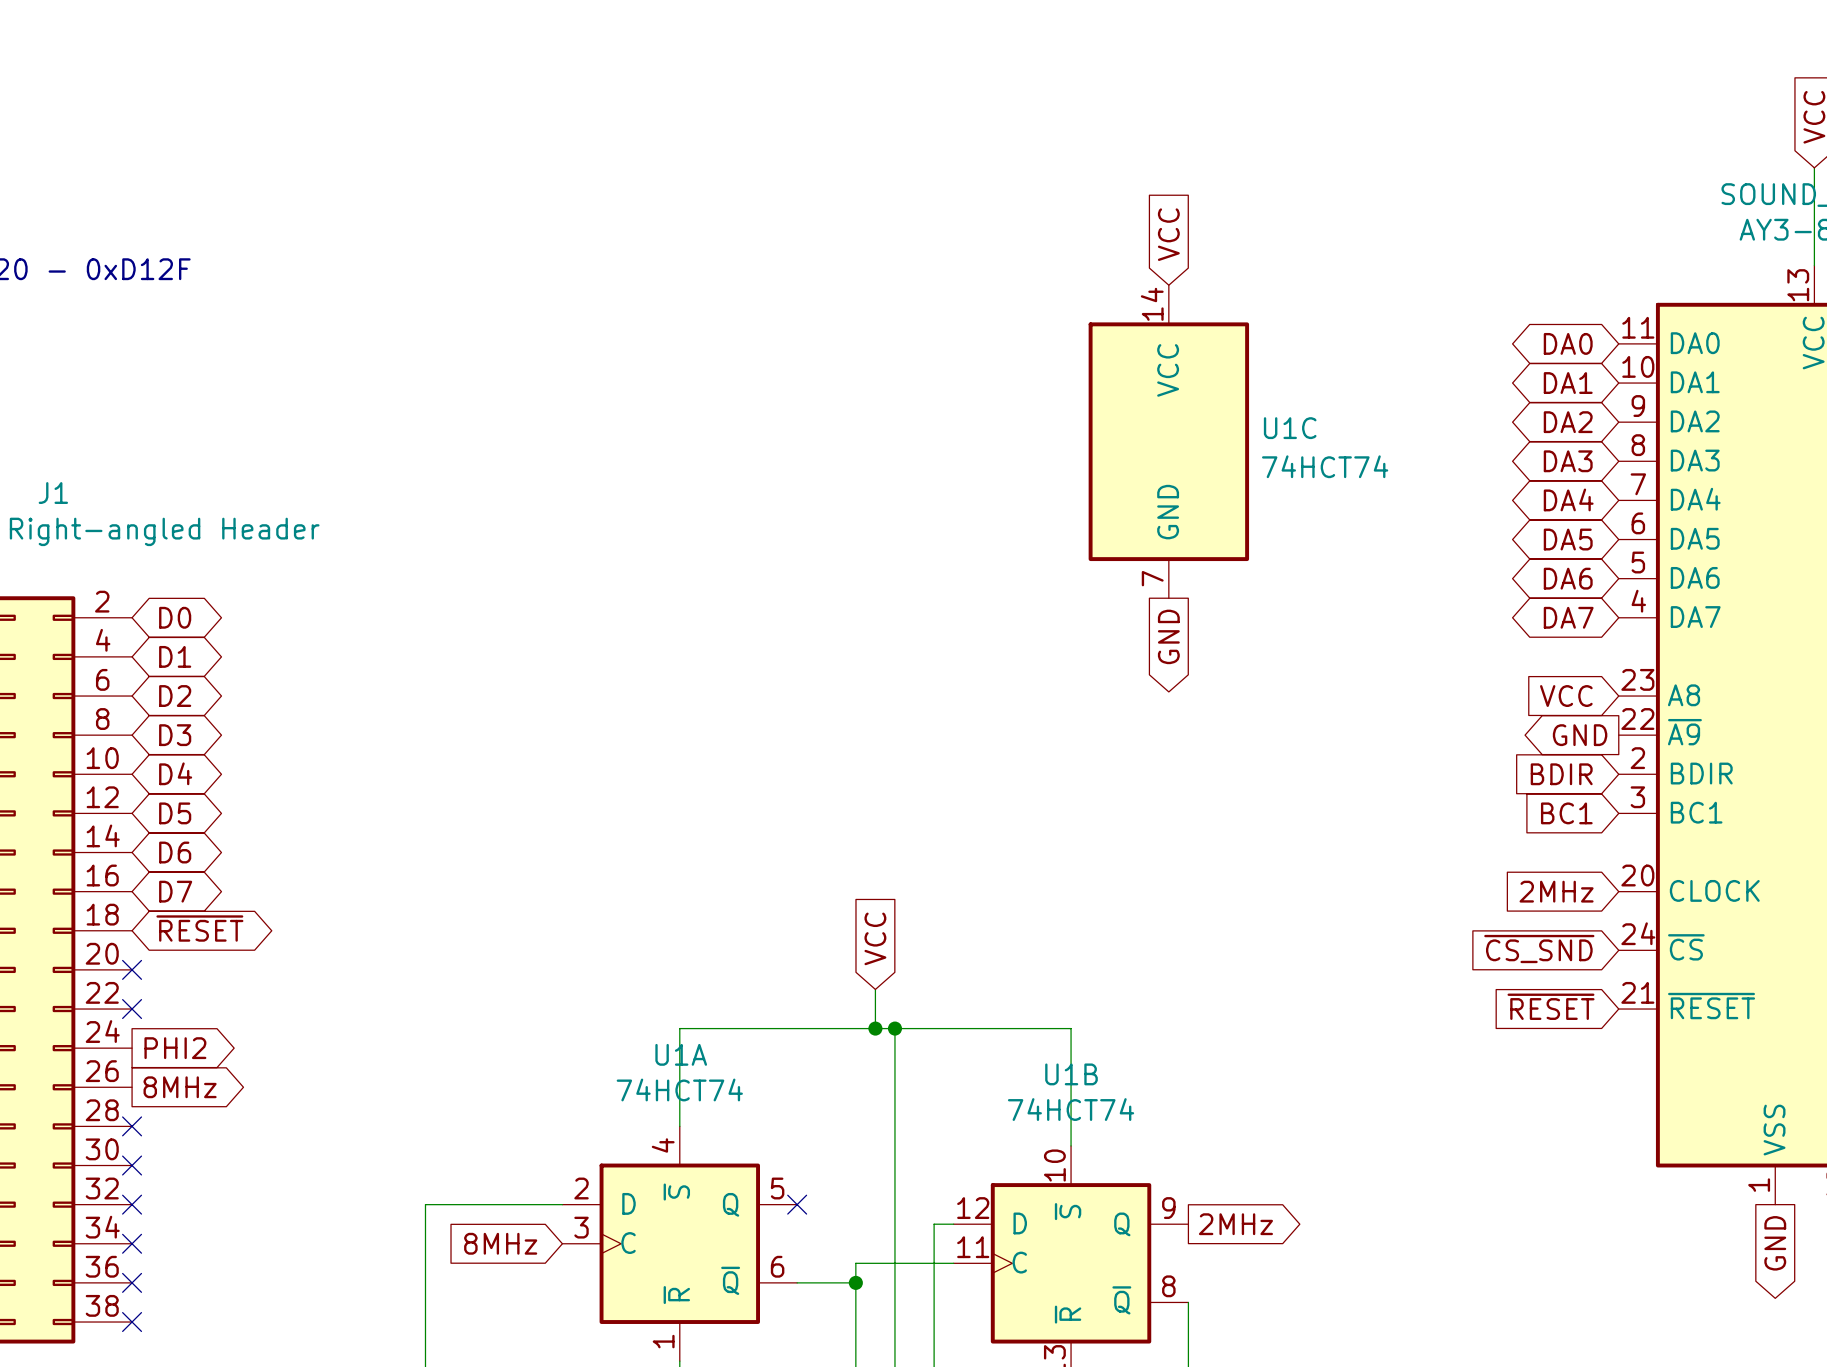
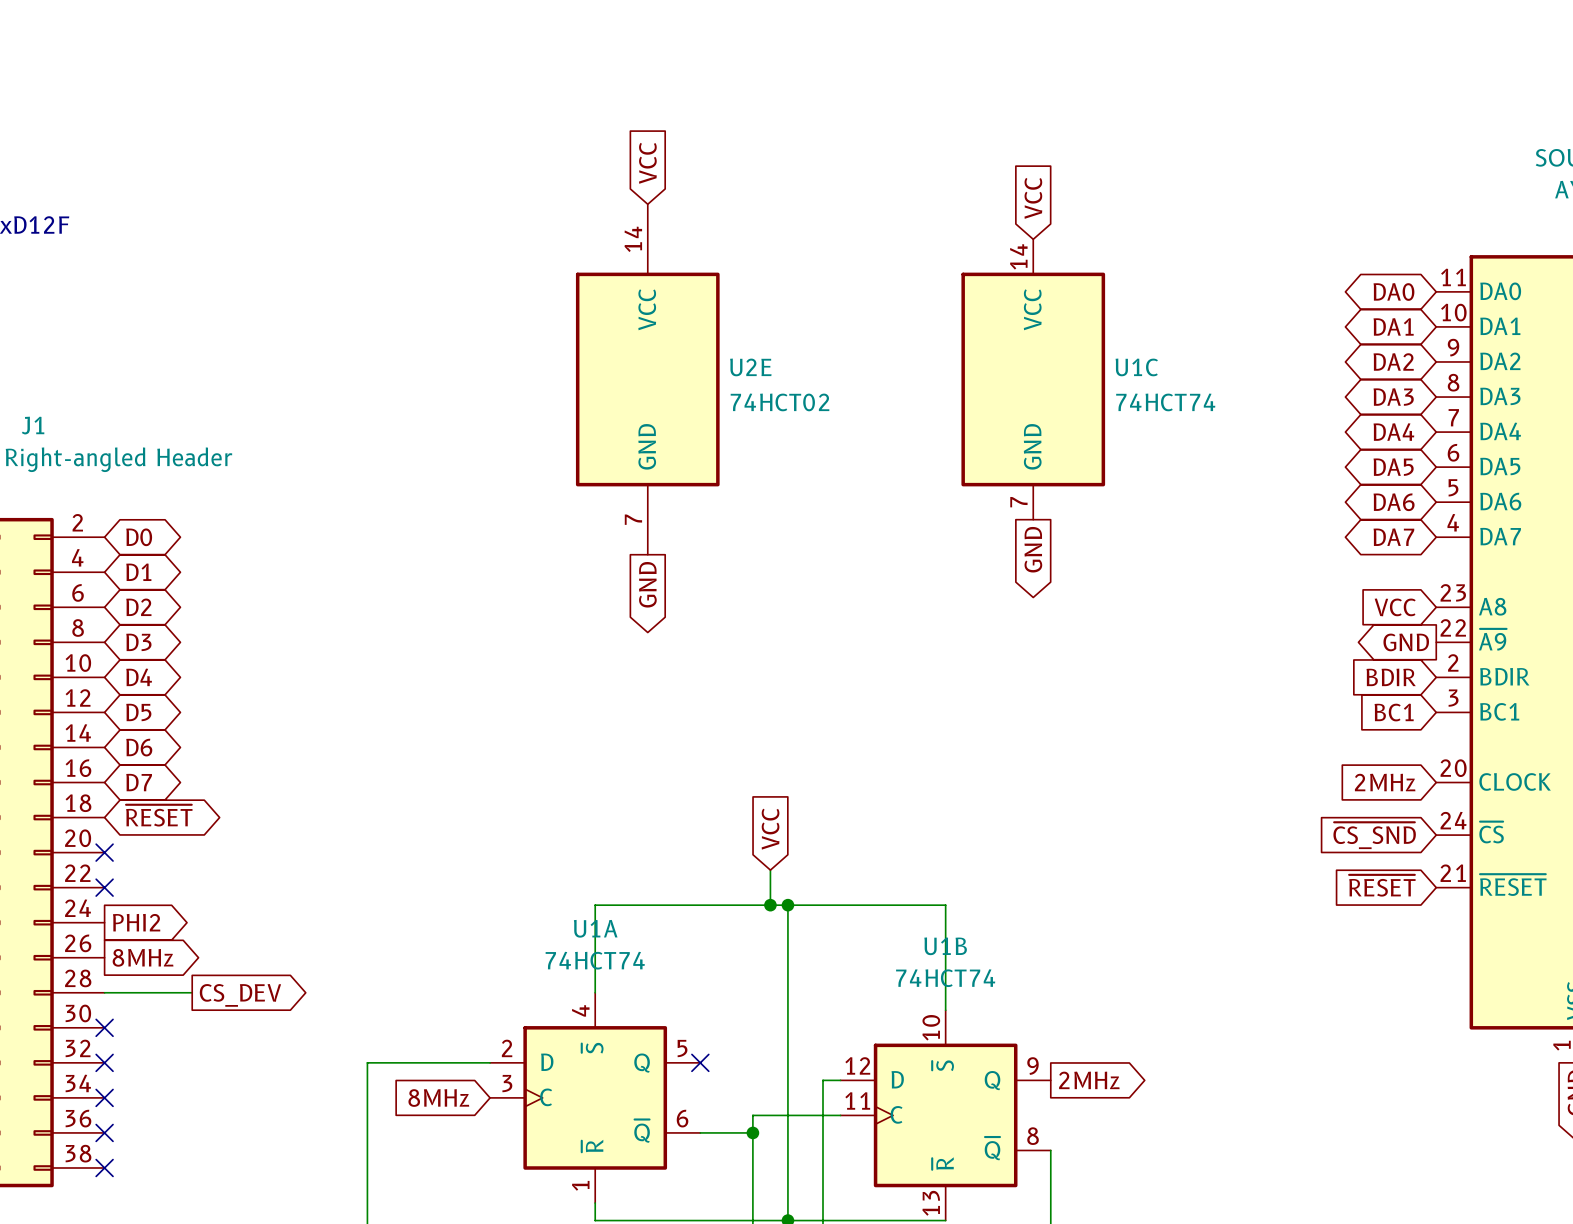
global label: none -> VCC (647, 163)
U2E: none -> 74HCT02 (647, 379)
global label: none -> GND (647, 584)
wire: none -> (104, 992) (192, 992)
no-connect mark: (132, 1126) -> none
global label: none -> CS_DEV (240, 995)

